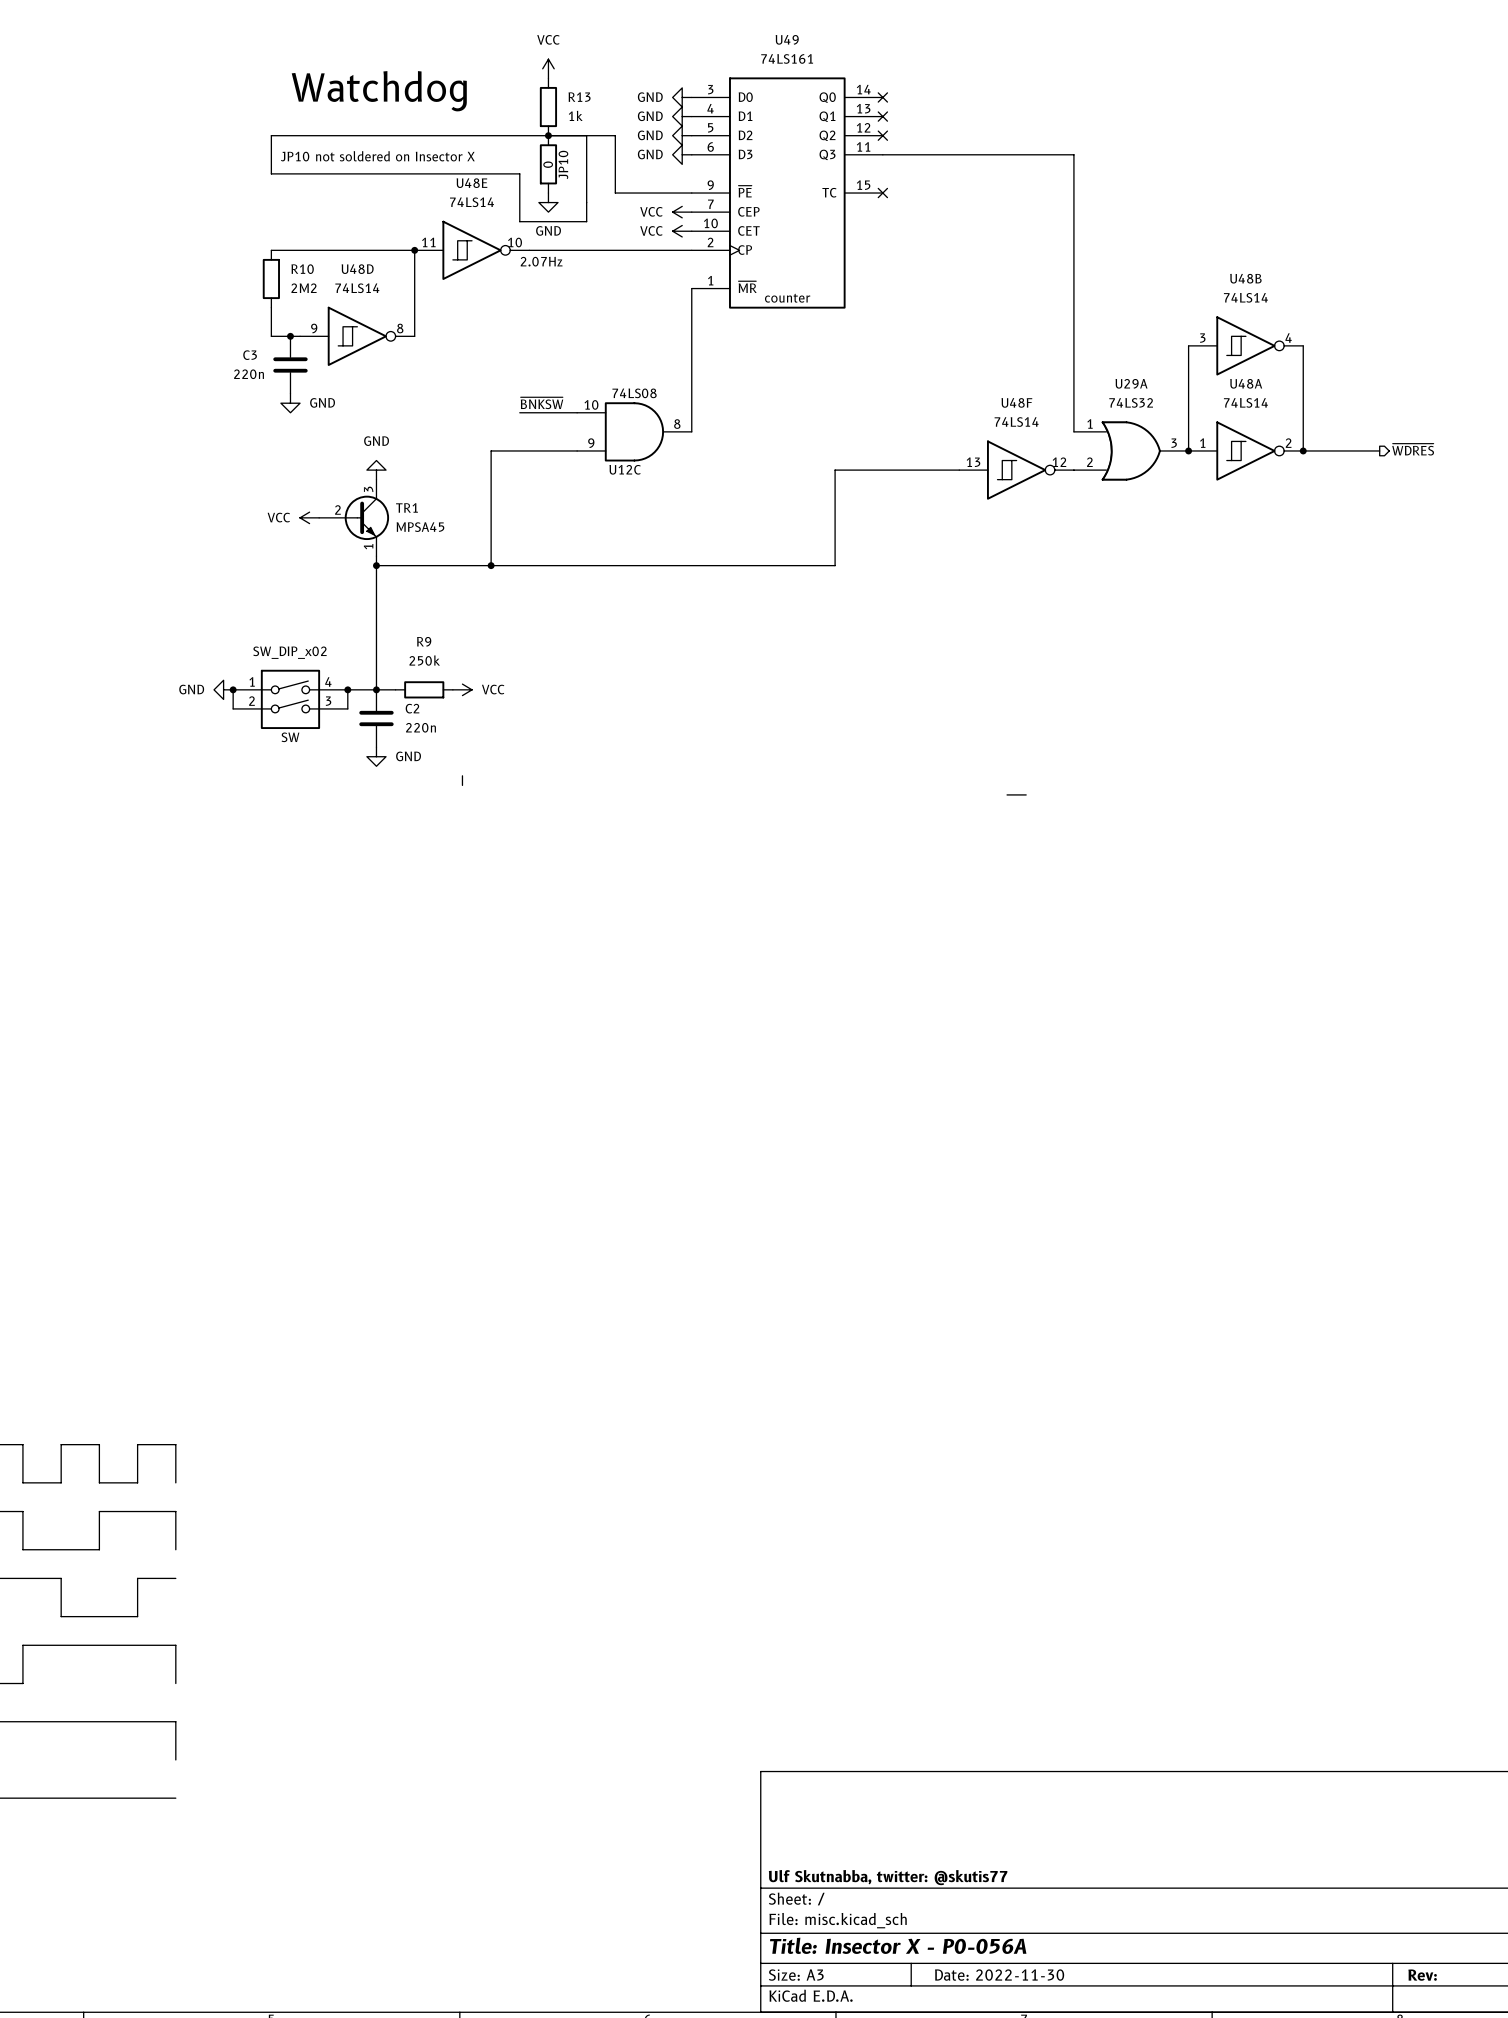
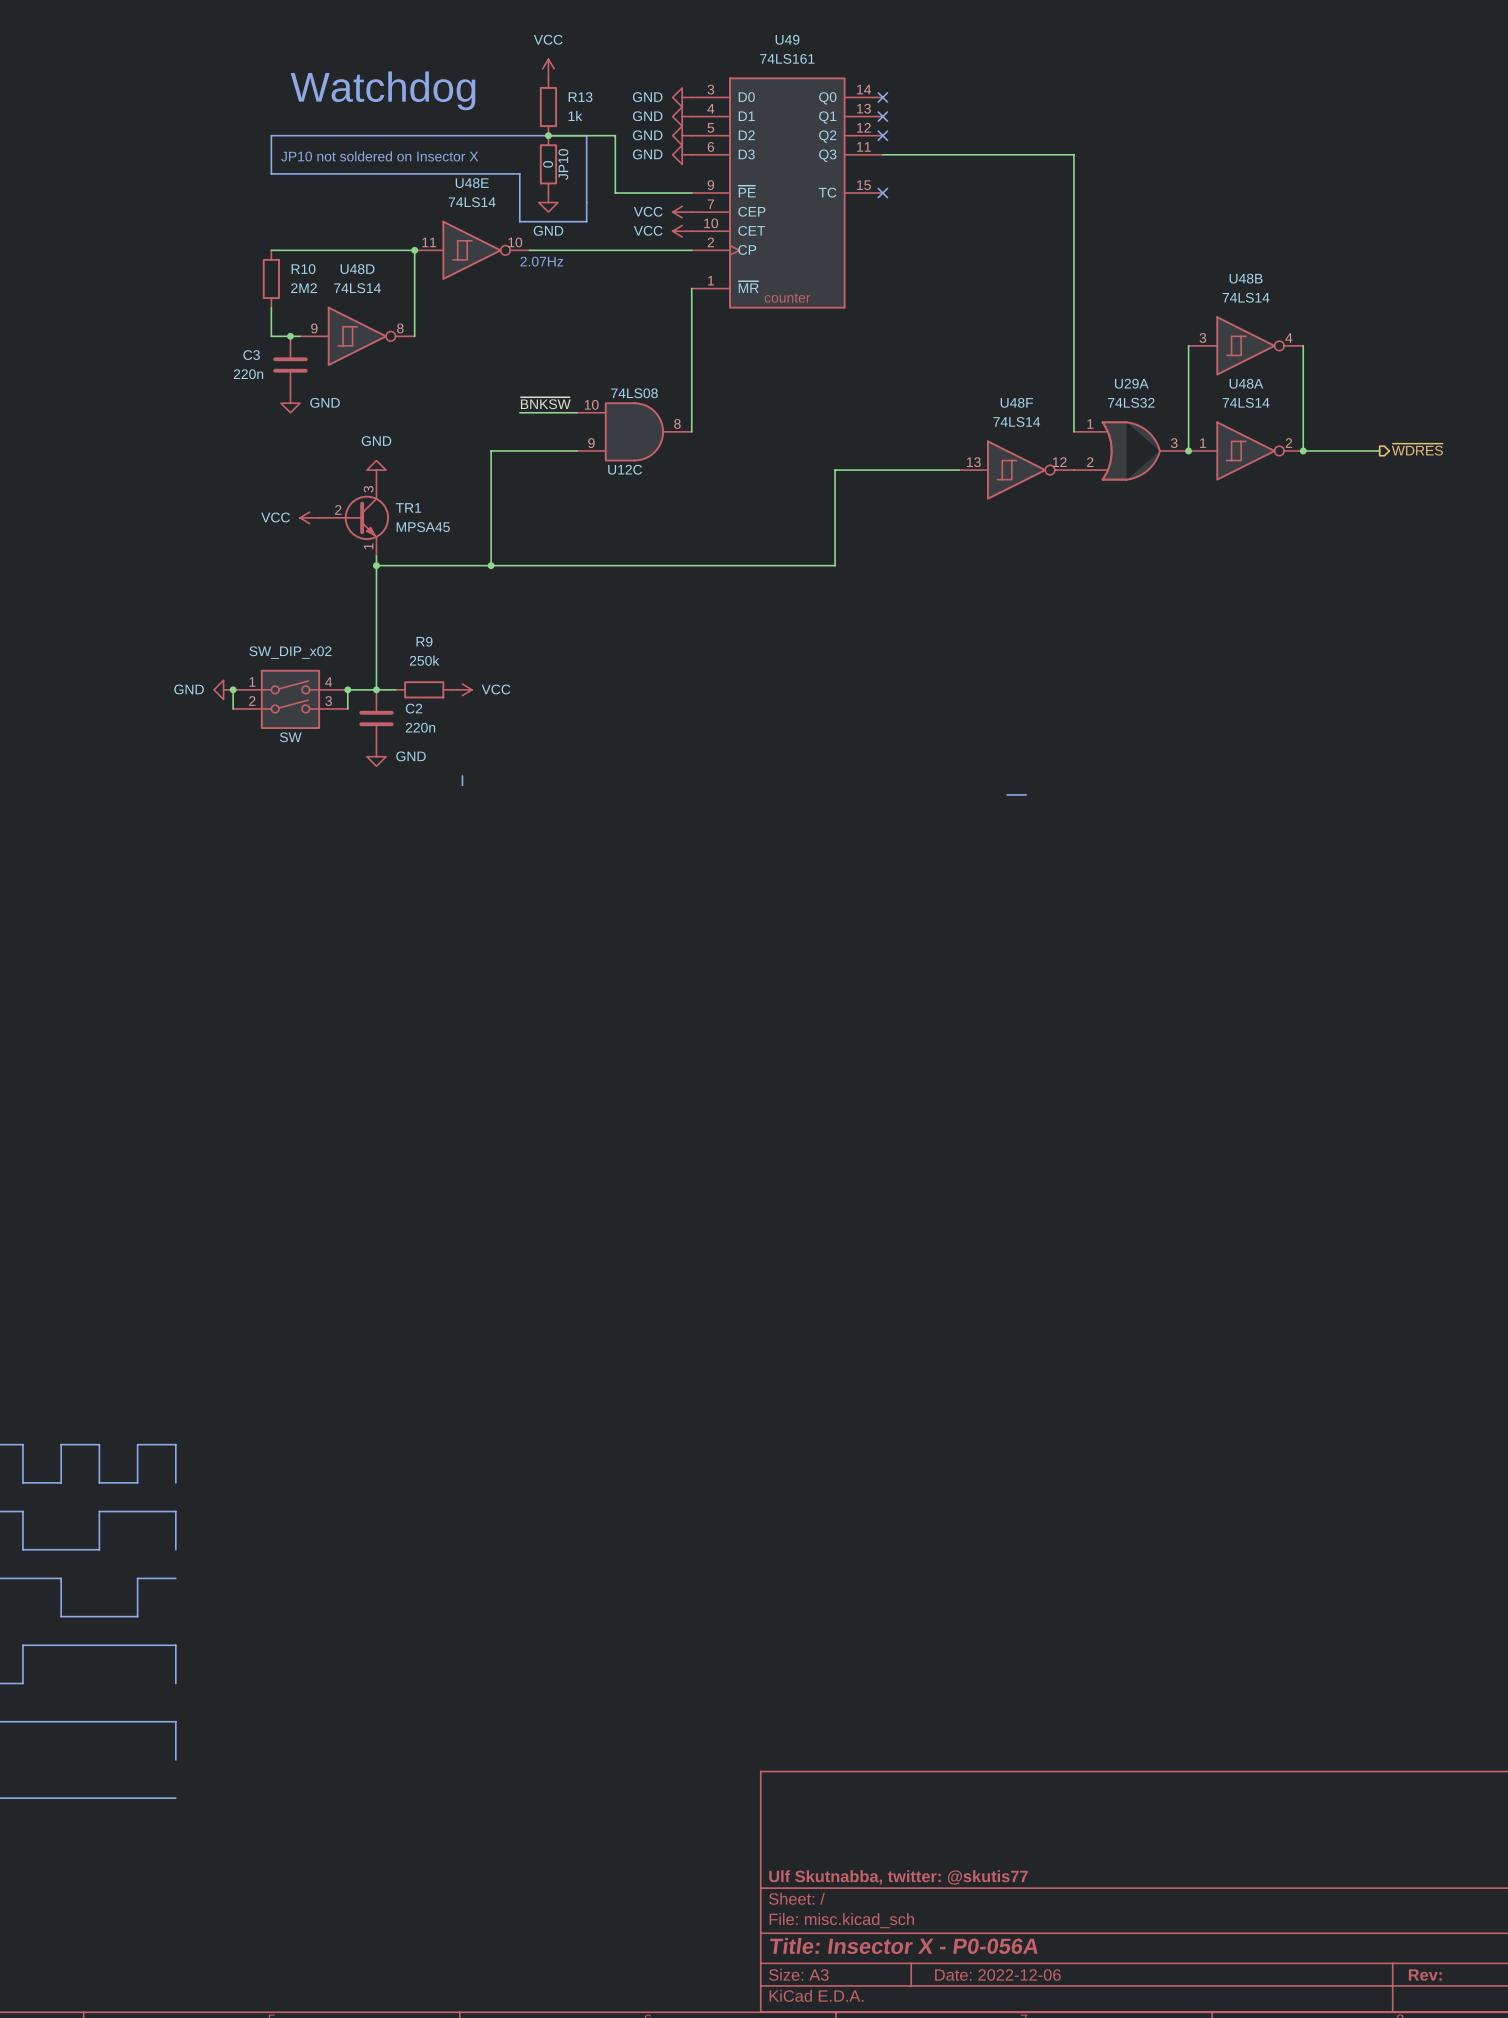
title block: Date: 2022-11-30 (999, 1975) -> Date: 2022-12-06 (997, 1974)

